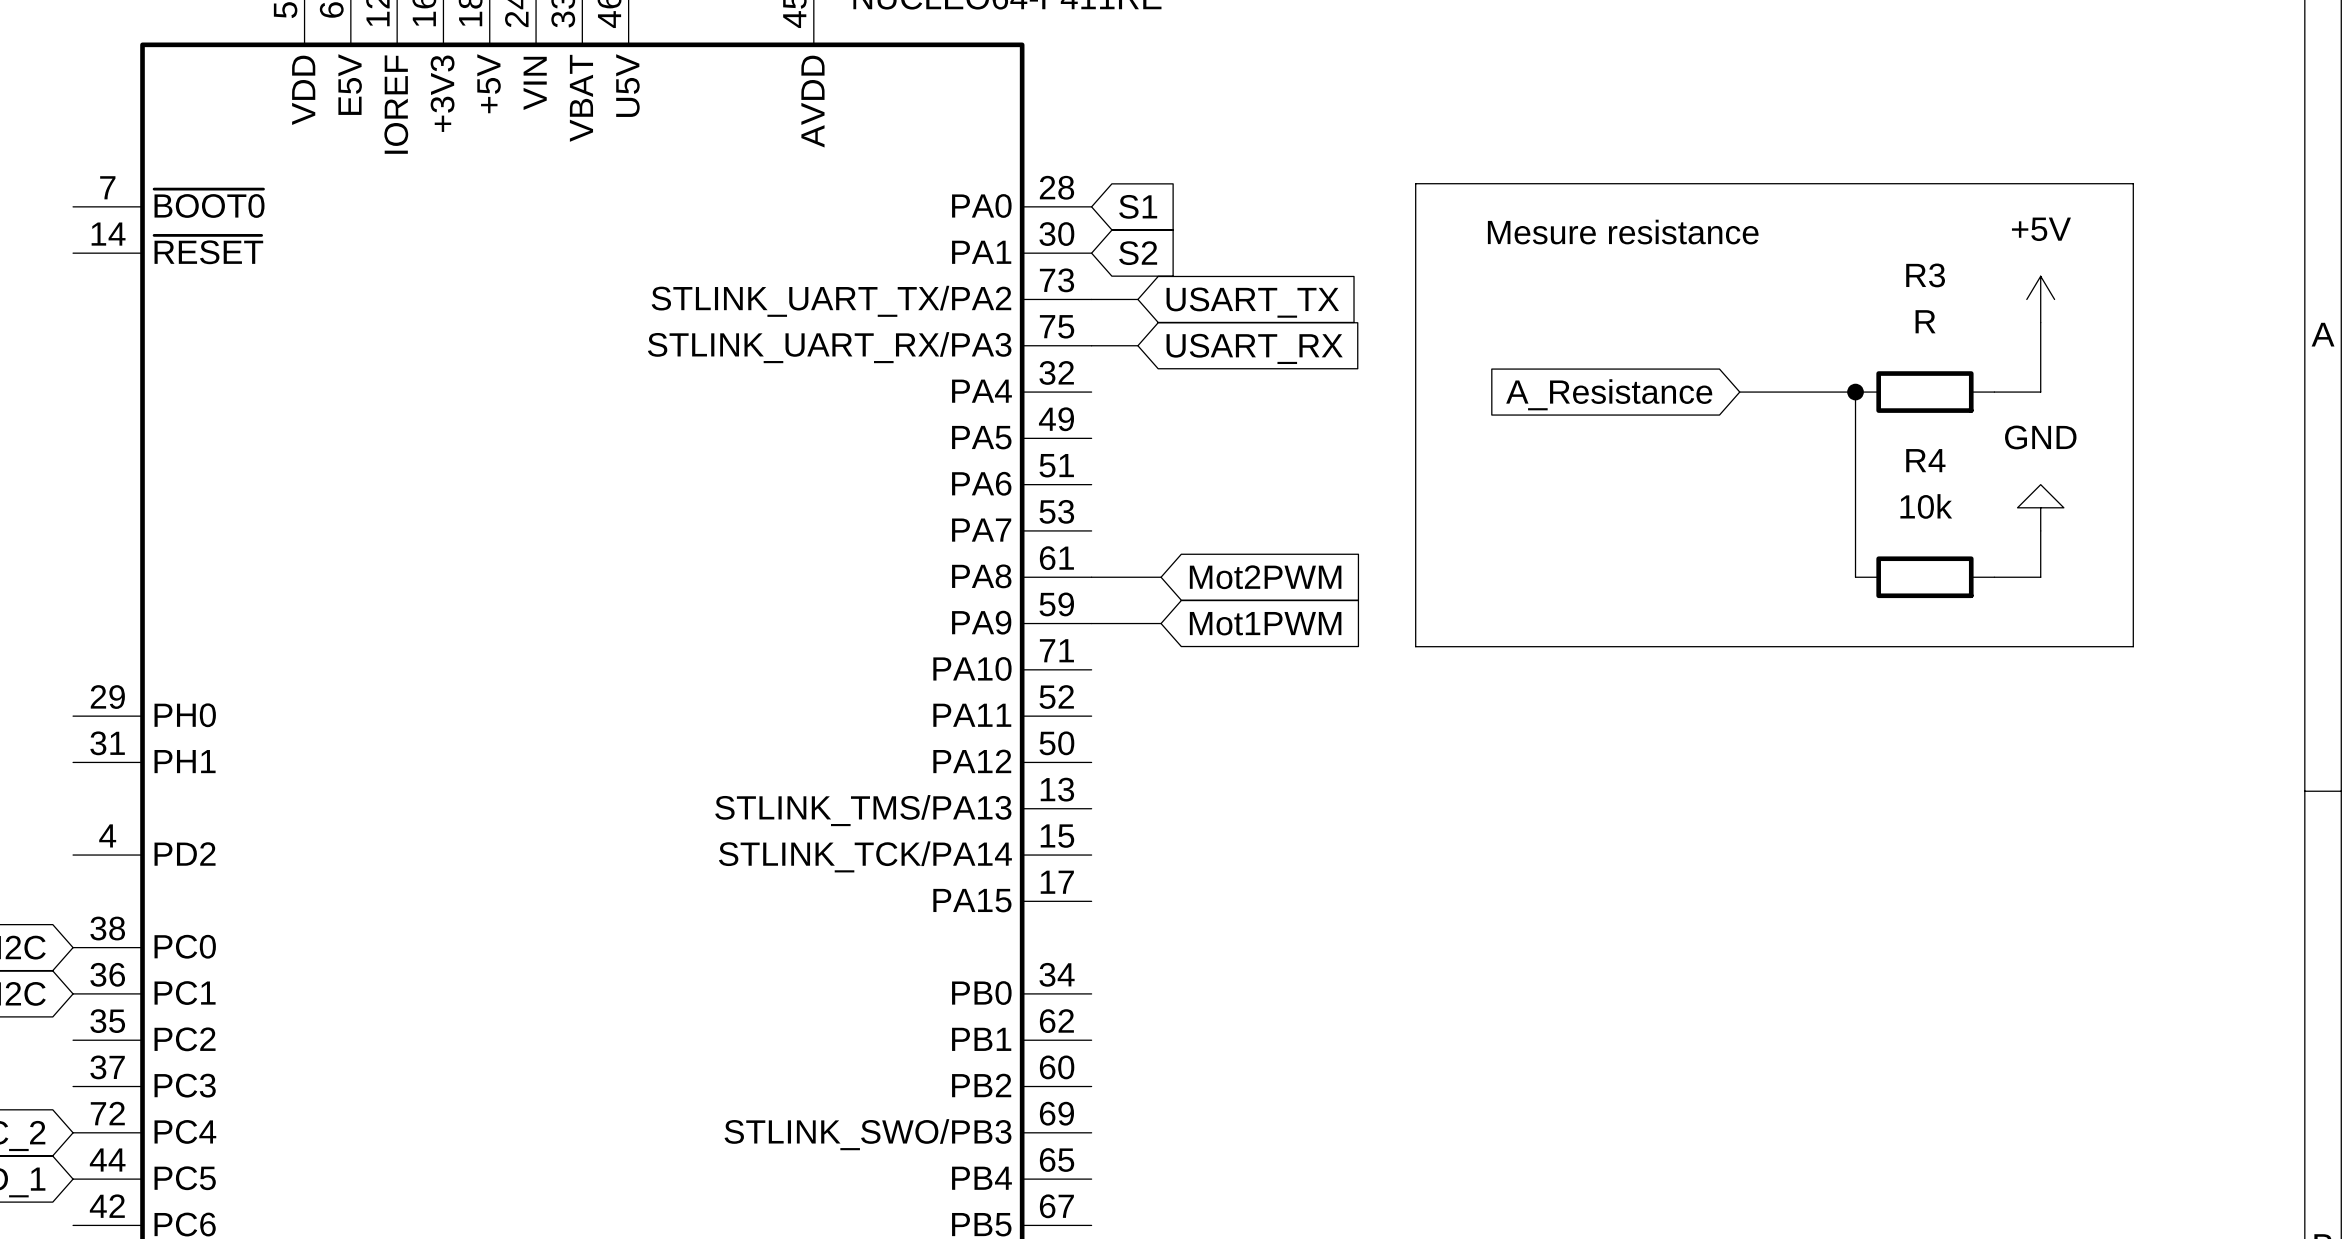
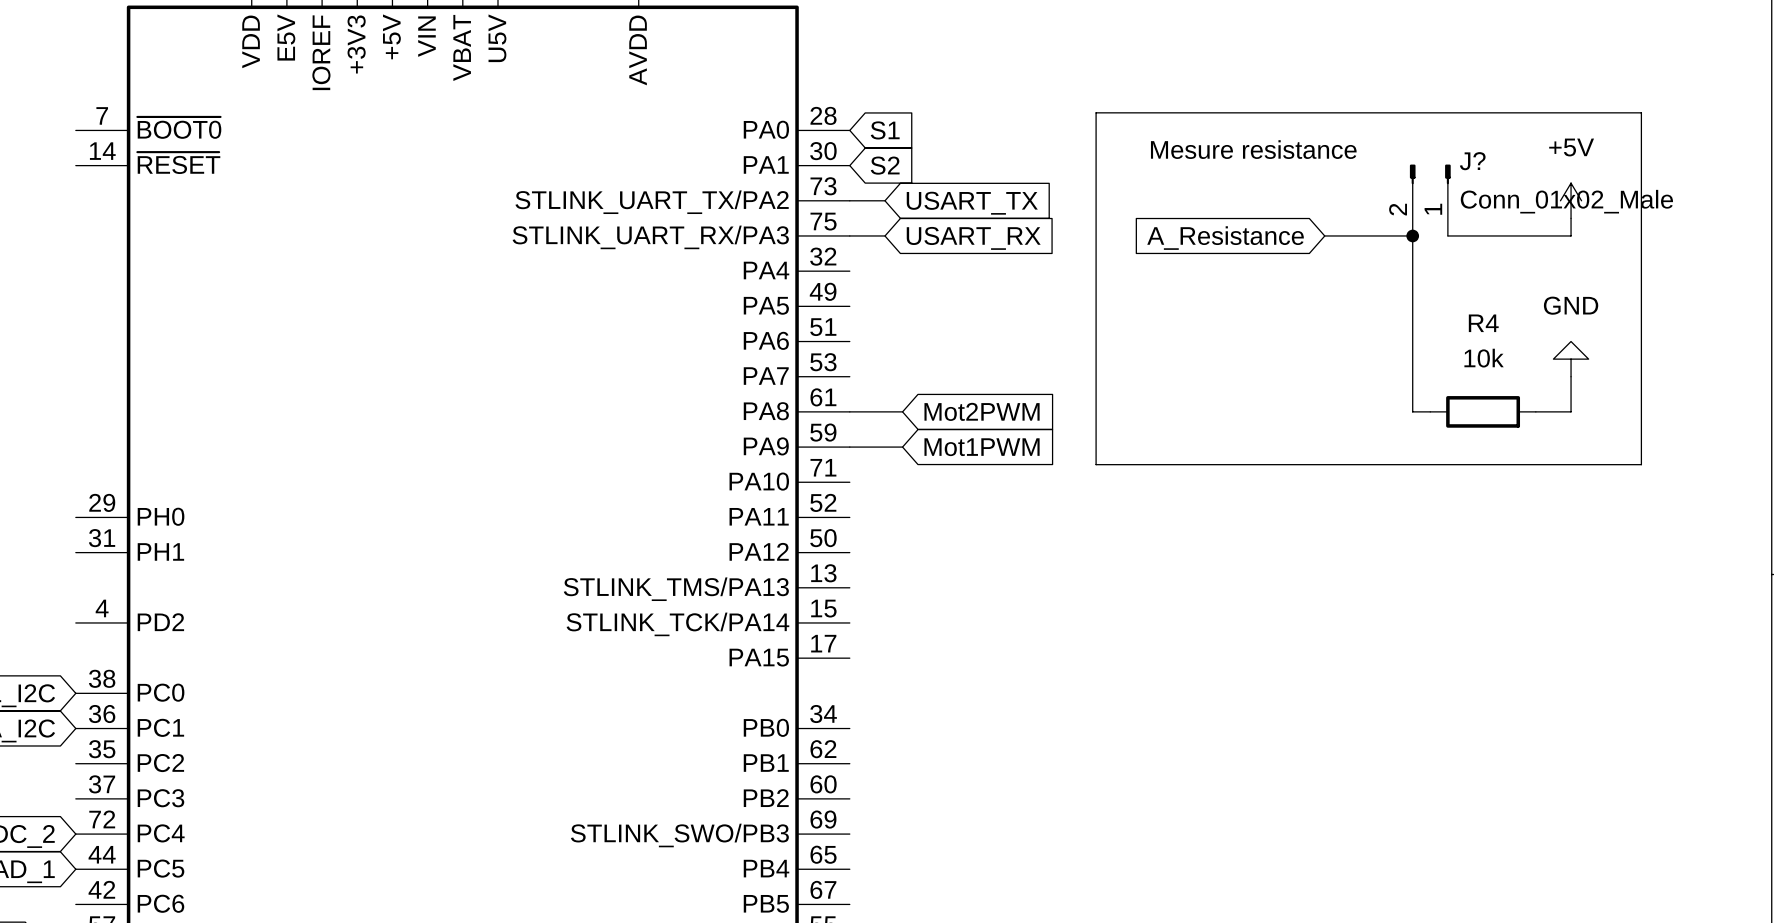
J?: none -> Conn_01x02_Male (1430, 200)
wire: (2040, 345) (2040, 392) (1994, 392) -> (1571, 235) (1447, 235)
wire: (1739, 392) (1855, 392) (1855, 577) -> (1324, 235) (1412, 235) (1412, 411) (1430, 411)
junction position: (1855, 392) -> (1412, 235)
R3: R (1924, 392) -> none
global label position: A_Resistance (1609, 394) -> A_Resistance (1225, 238)

